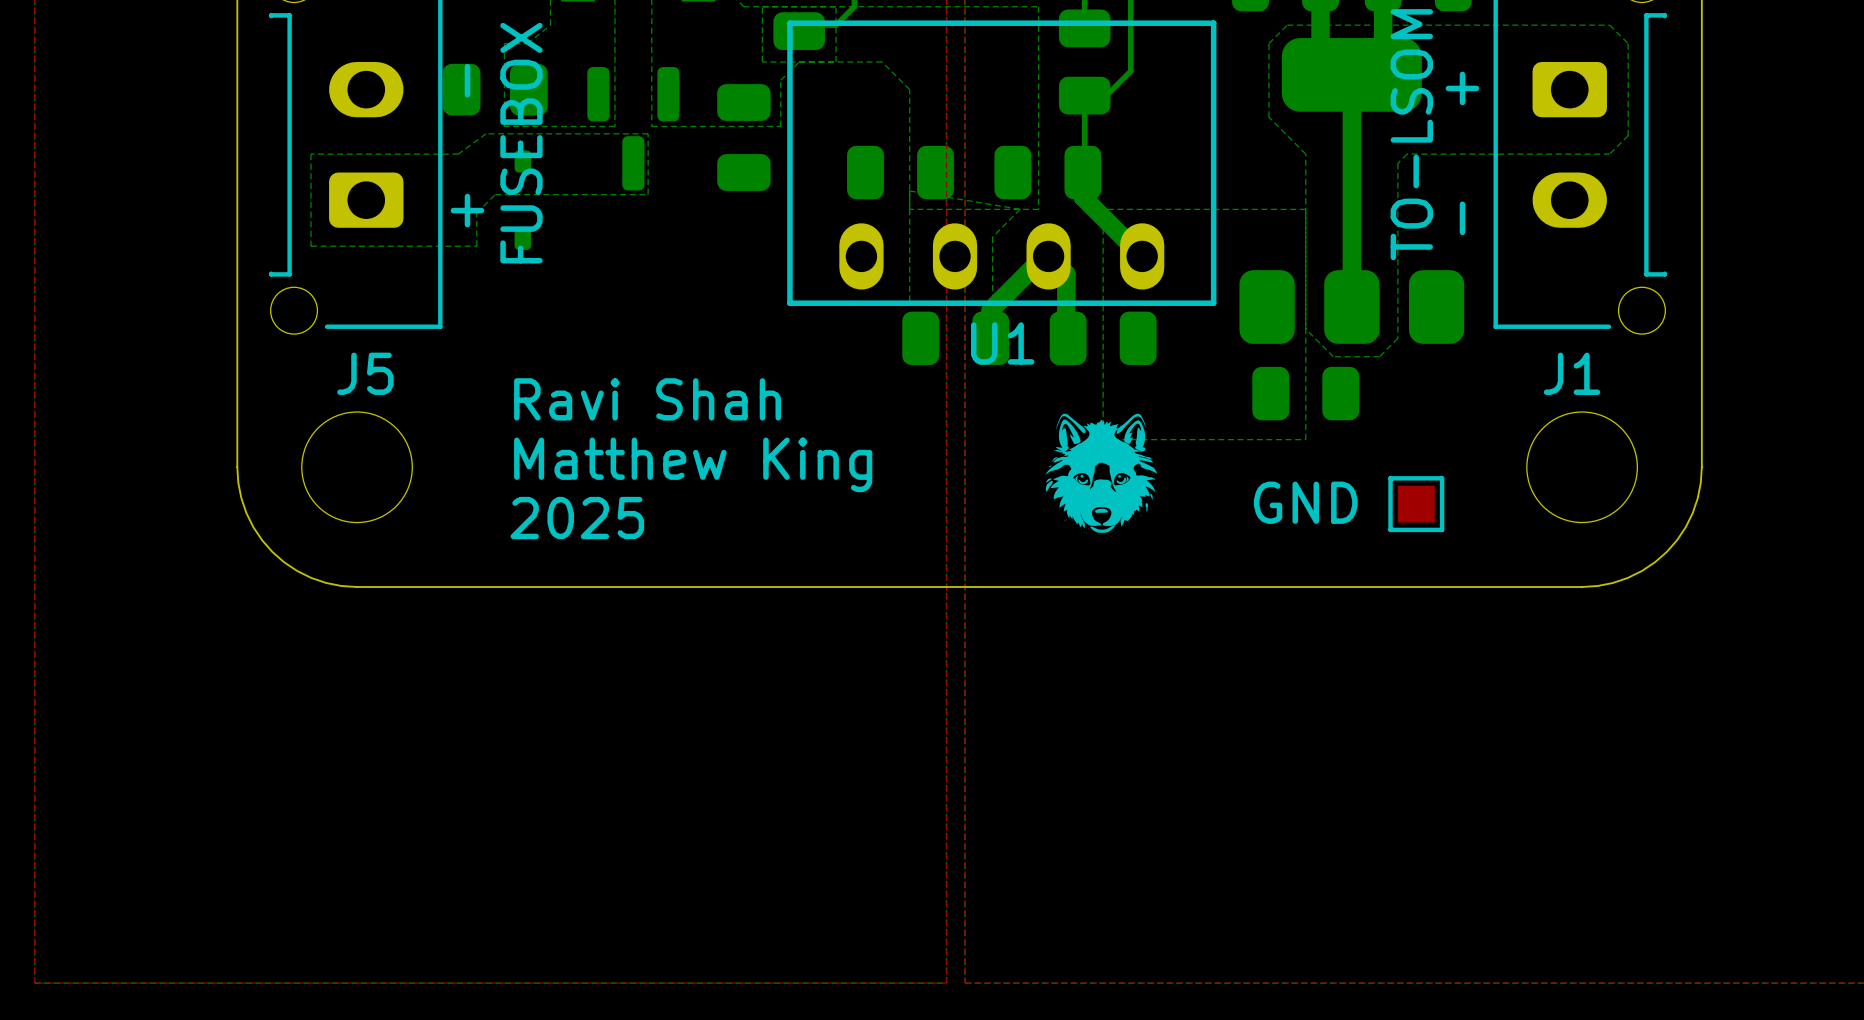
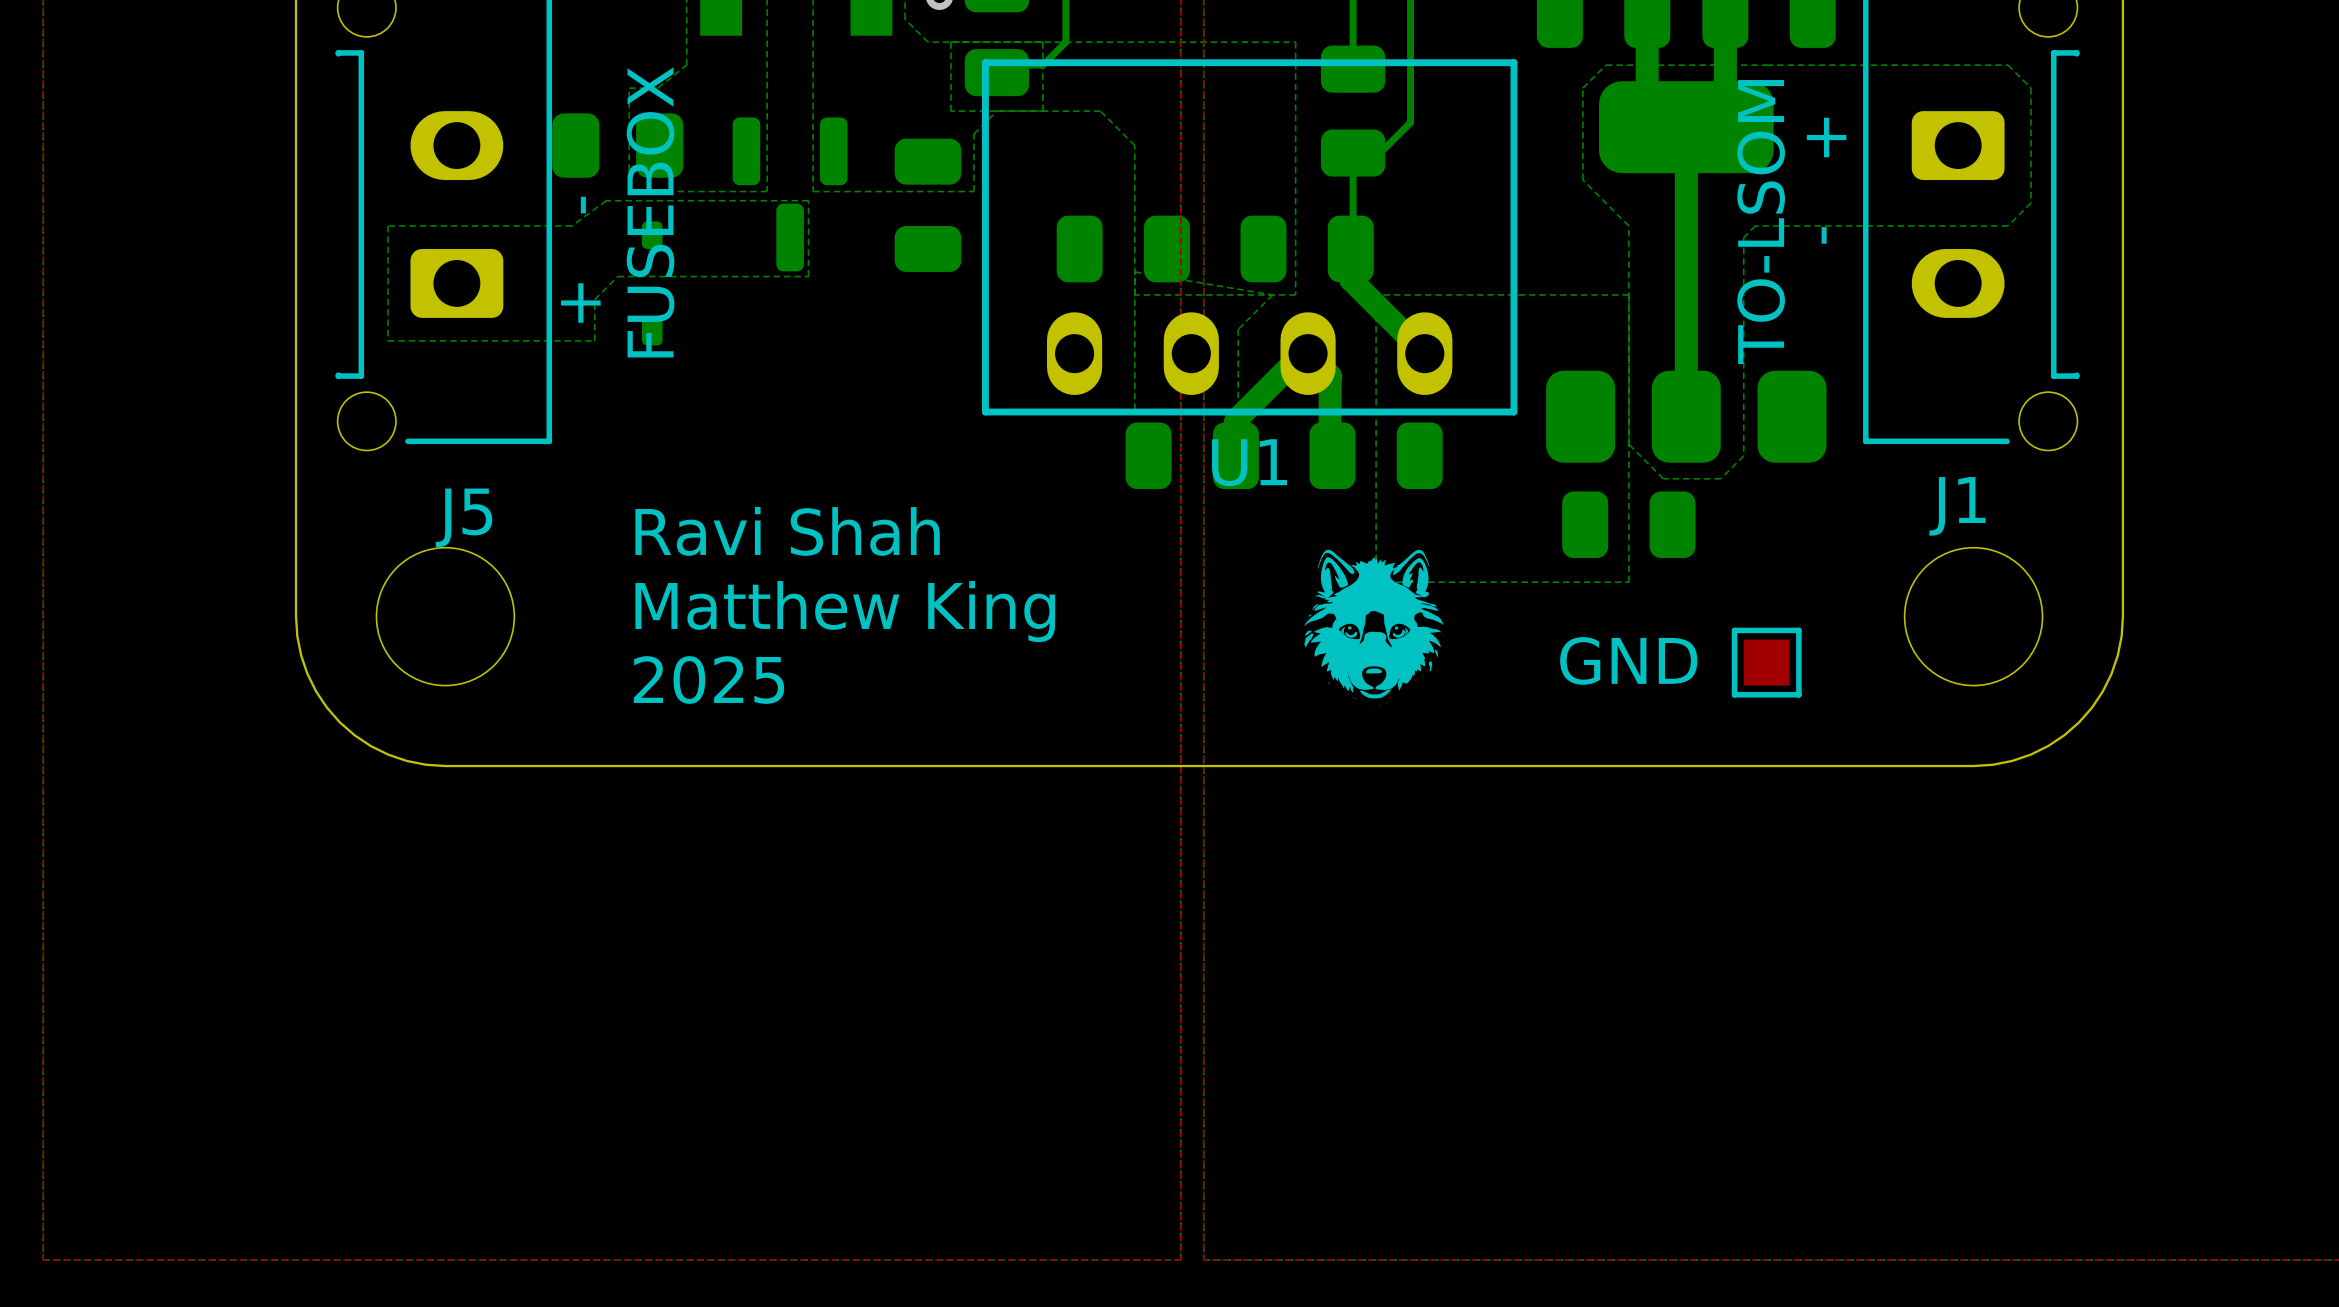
J5 name position: J5 (365, 373) -> J5 (464, 517)

